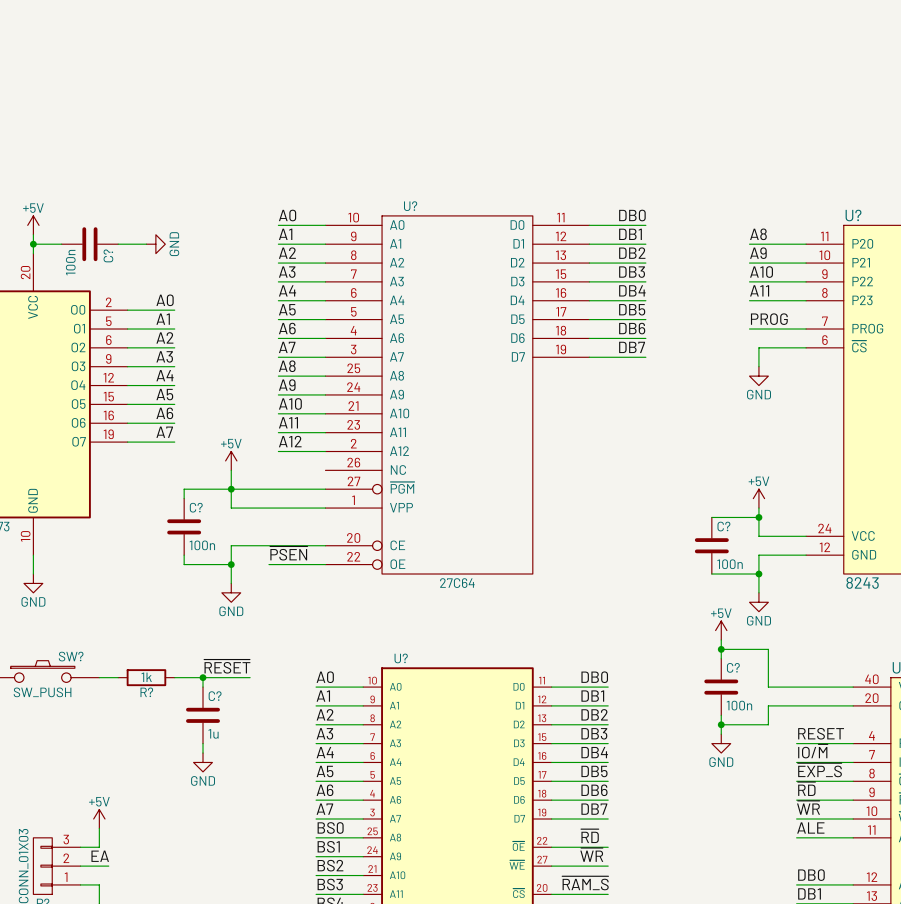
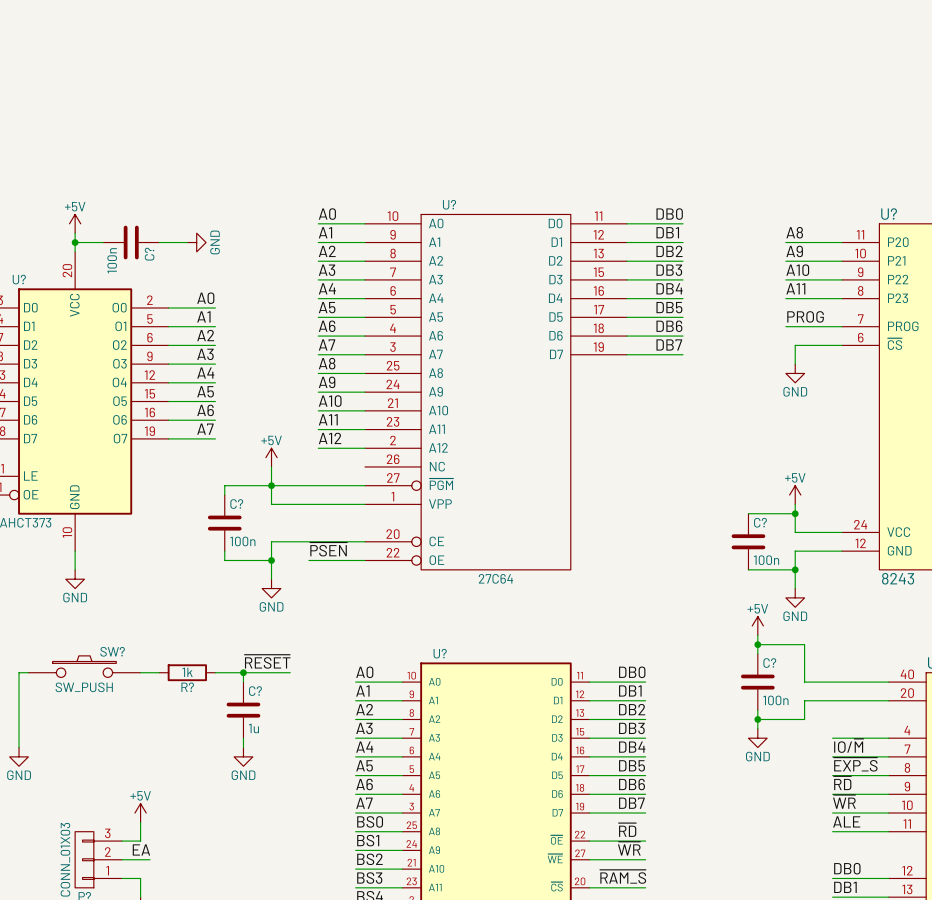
label: RESET (821, 733) -> none

